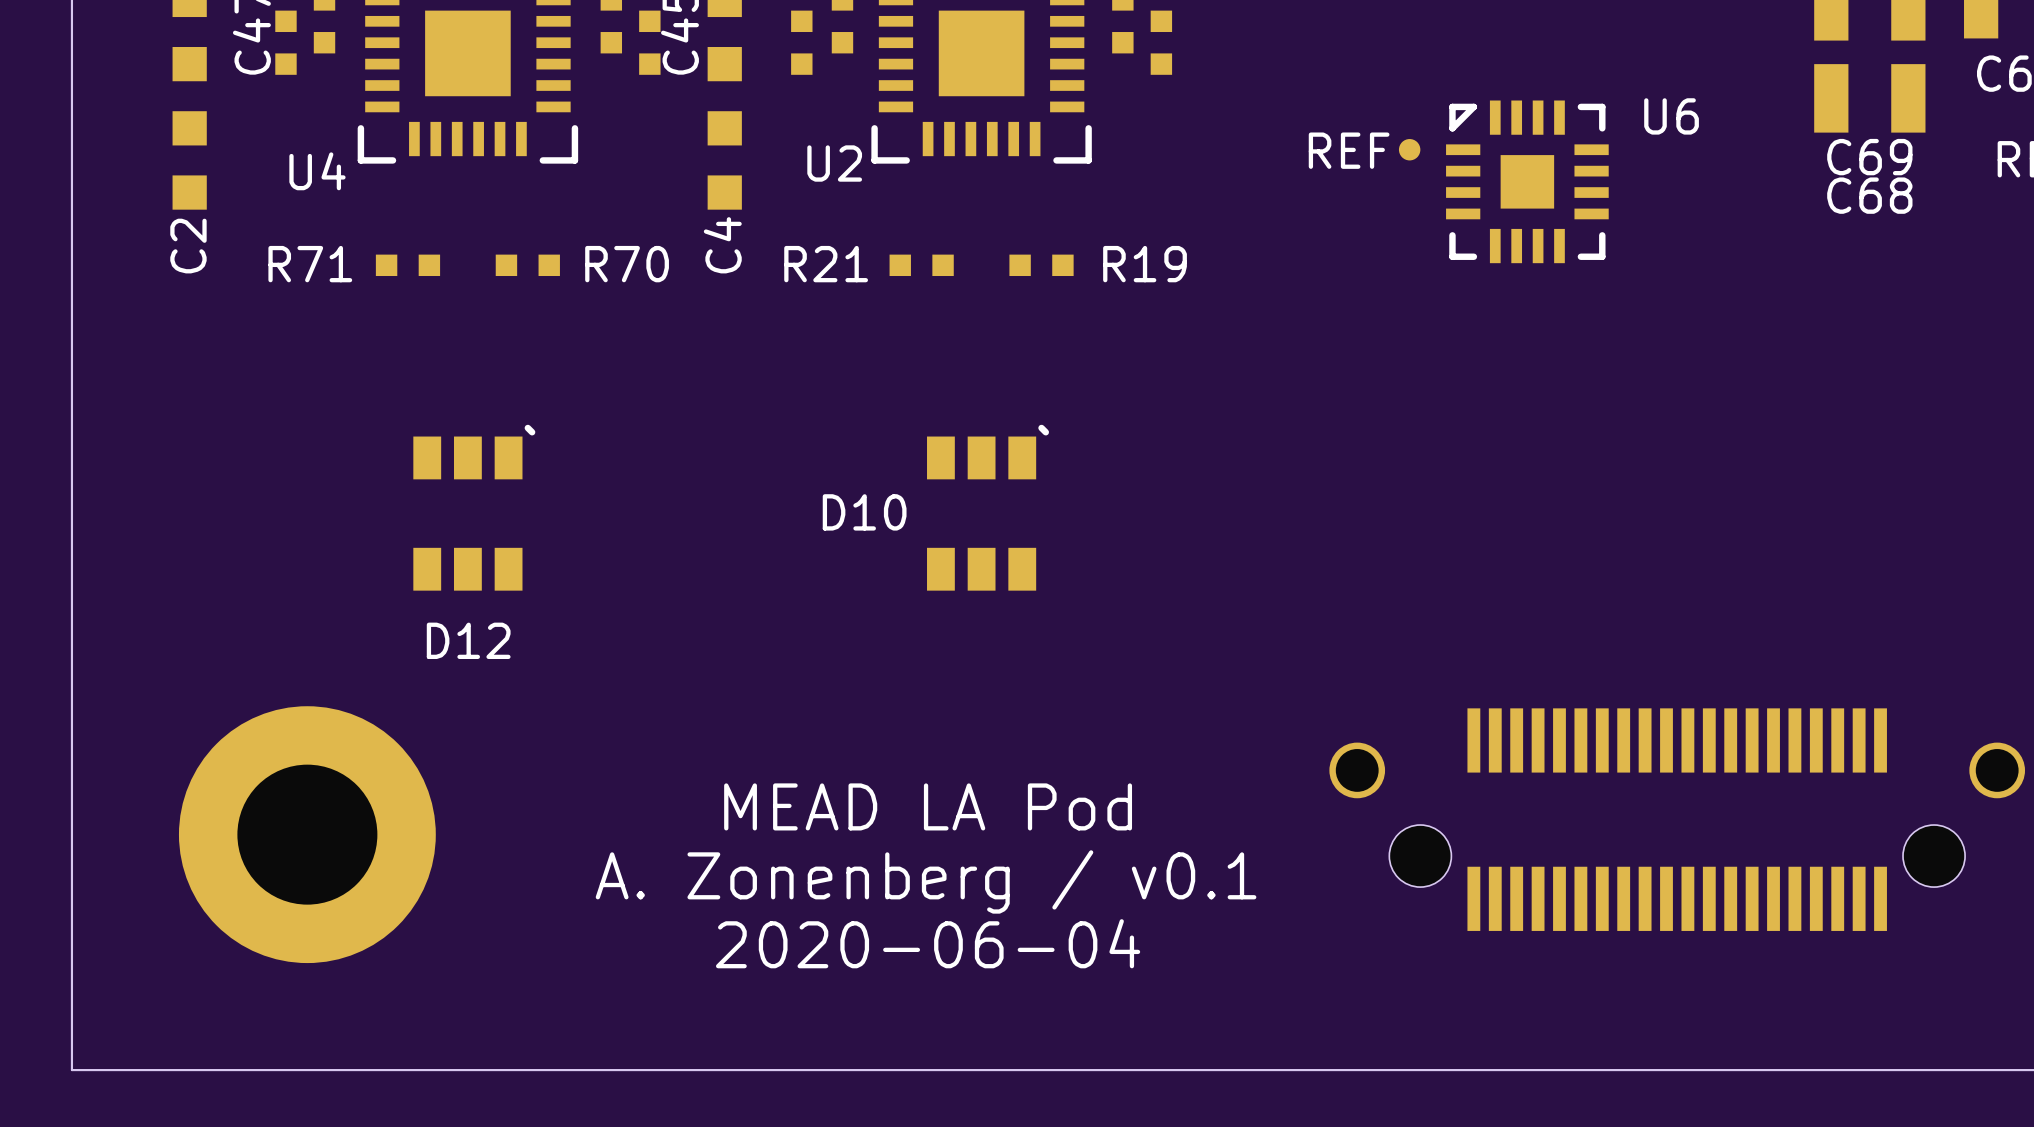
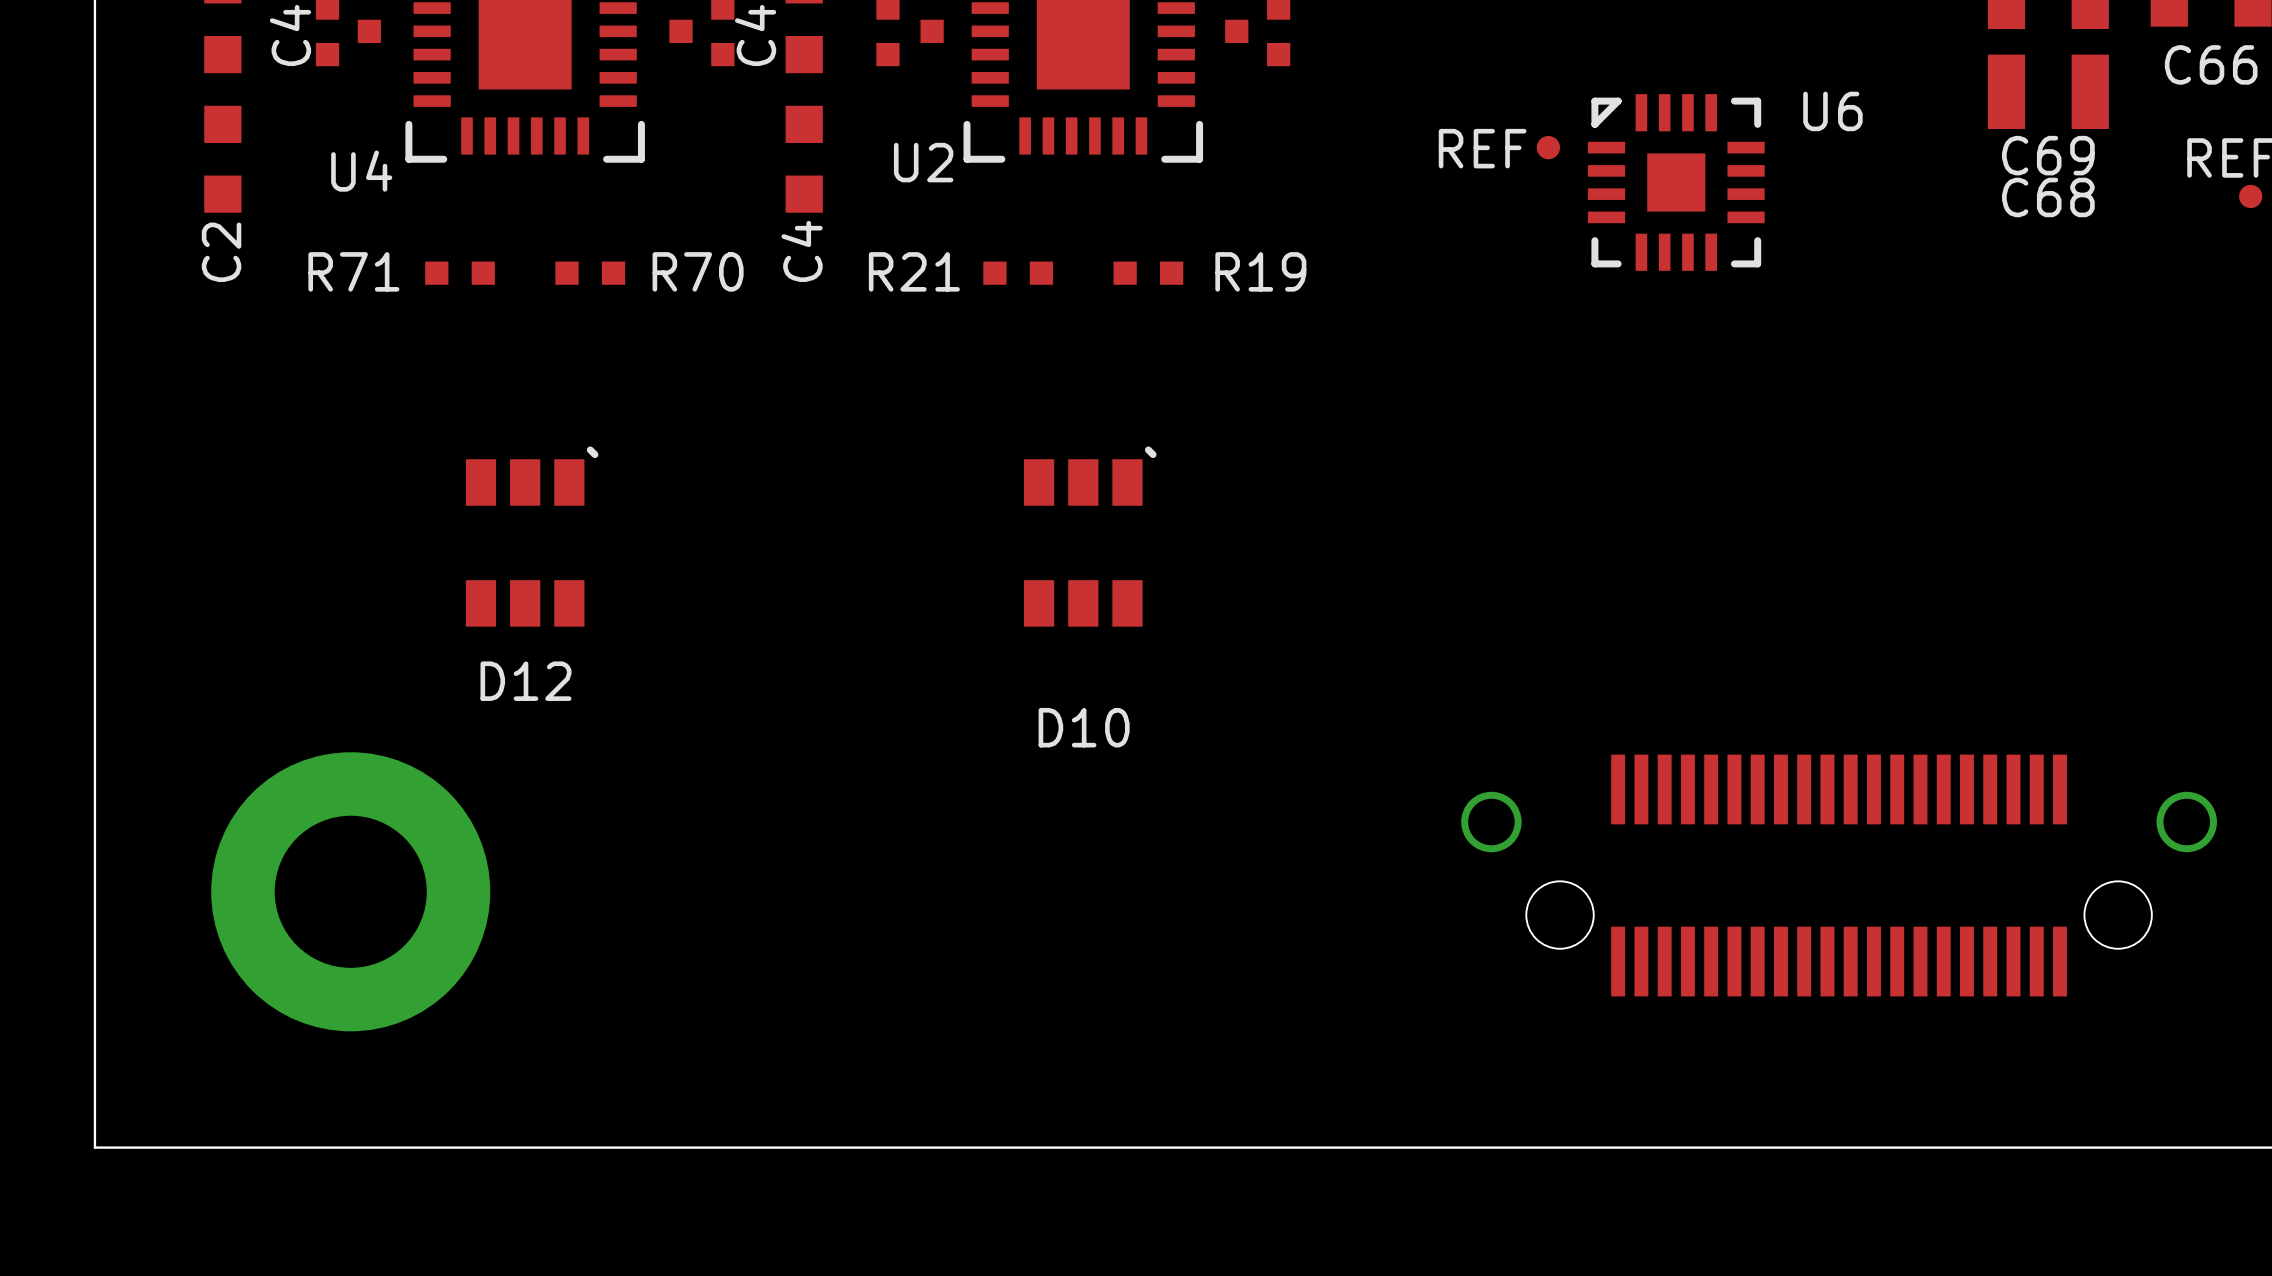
D10 name position: D10 (864, 512) -> D10 (1084, 727)
text: MEAD LA Pod (928, 806) -> none
text: A. Zonenberg / v0.1 (926, 881) -> none
text: 2020-06-04 (928, 943) -> none

